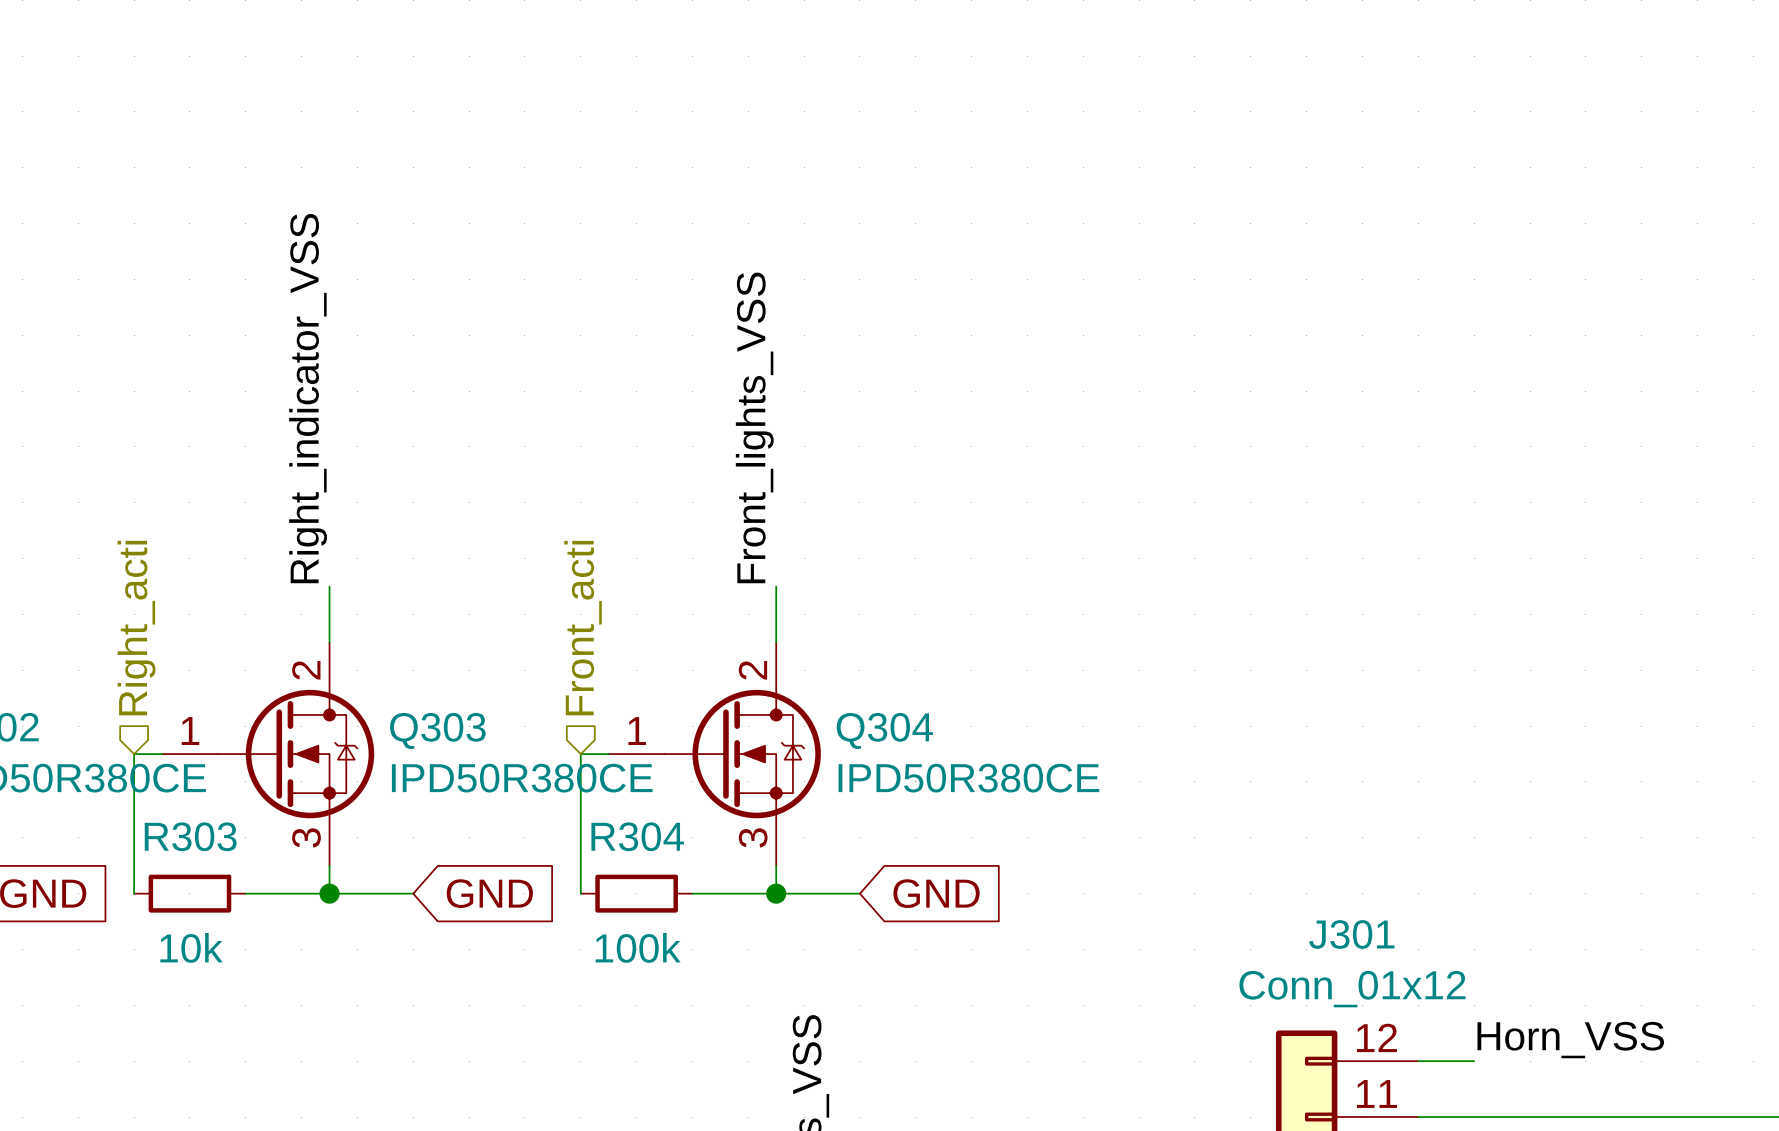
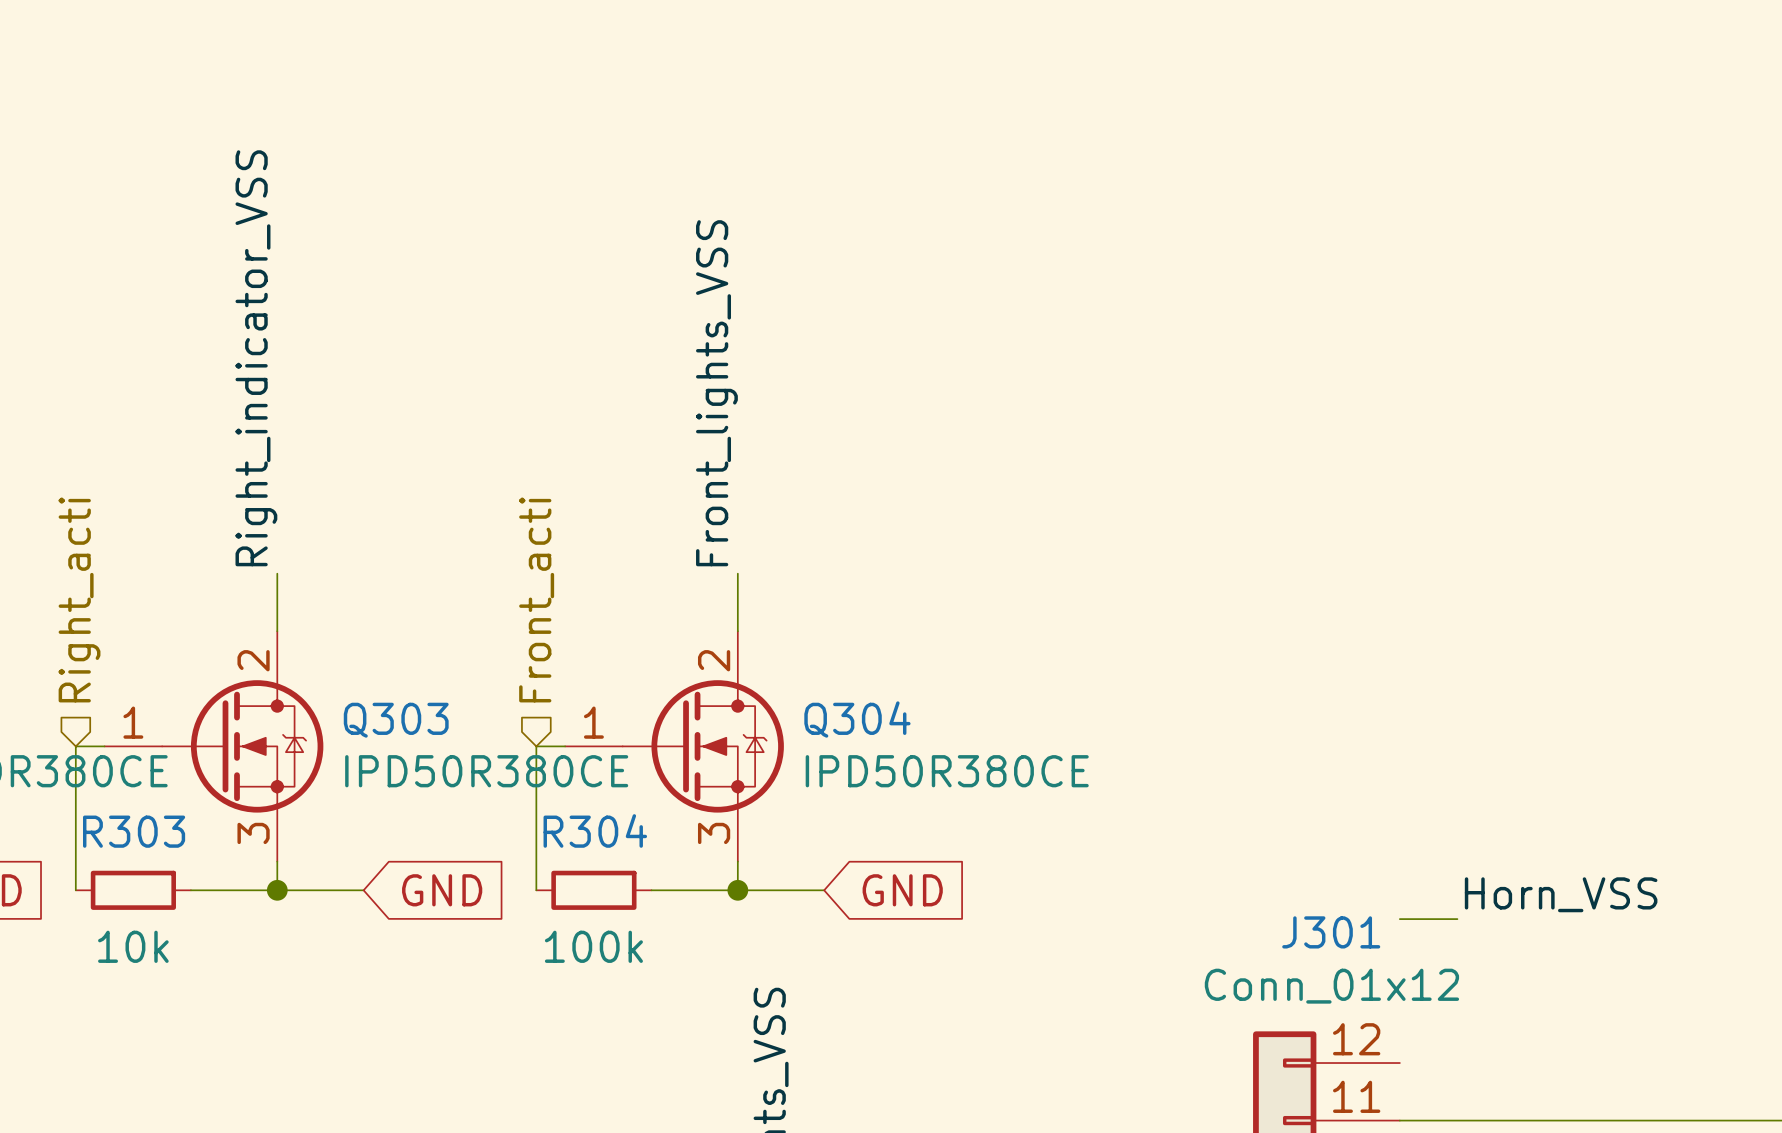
label position: Horn_VSS (1570, 1040) -> Horn_VSS (1561, 894)
wire: (1418, 1061) (1474, 1061) -> (1399, 919) (1457, 919)

